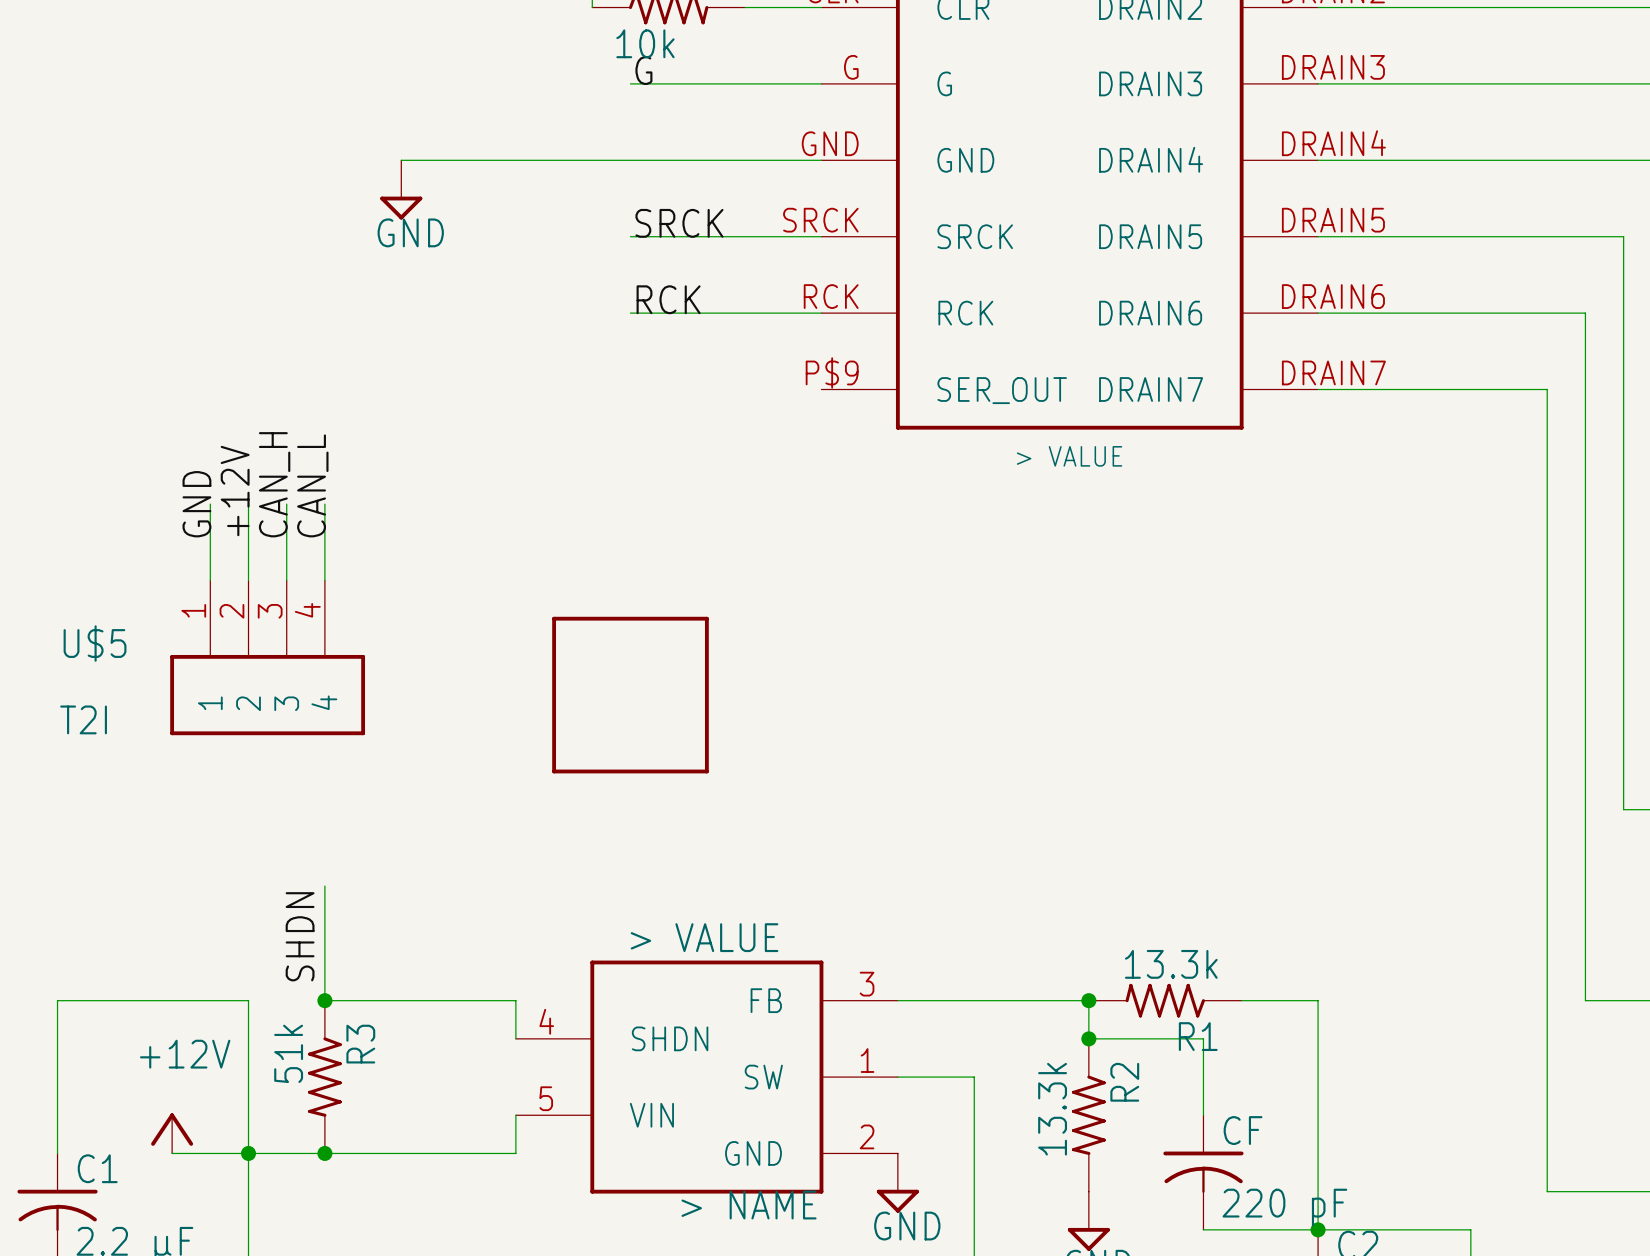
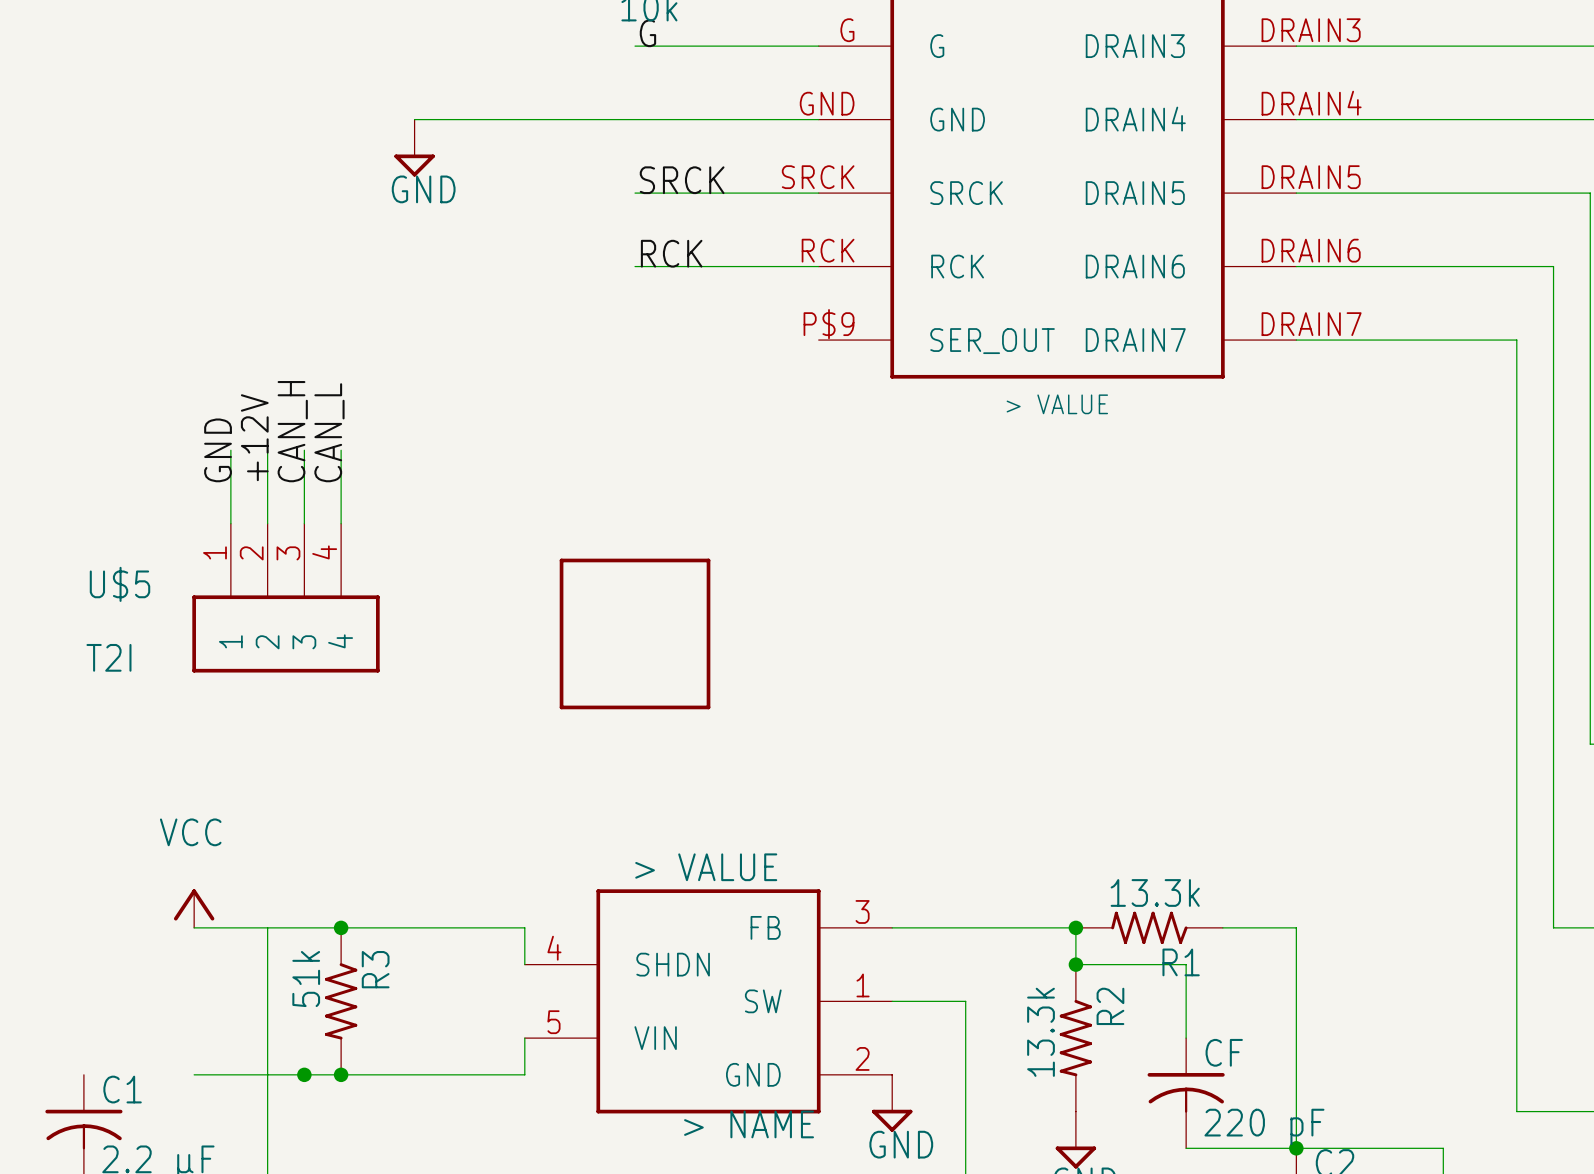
wire: (324, 886) (324, 1000) -> (267, 927) (341, 927)
label: SHDN (300, 936) -> none
power symbol: none -> VCC (194, 908)
wire: (172, 1000) (57, 1000) (57, 1153) -> none
power symbol: +12V (172, 1133) -> none
junction position: (248, 1153) -> (304, 1074)

